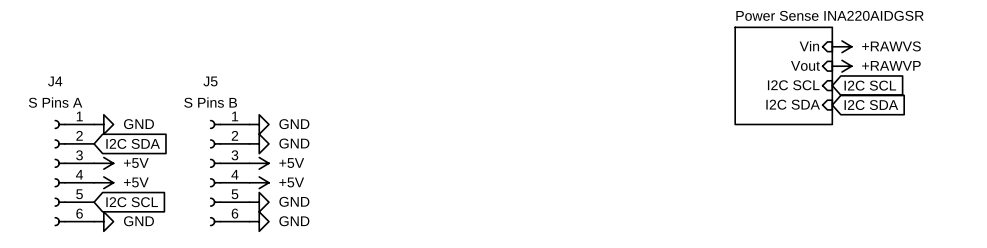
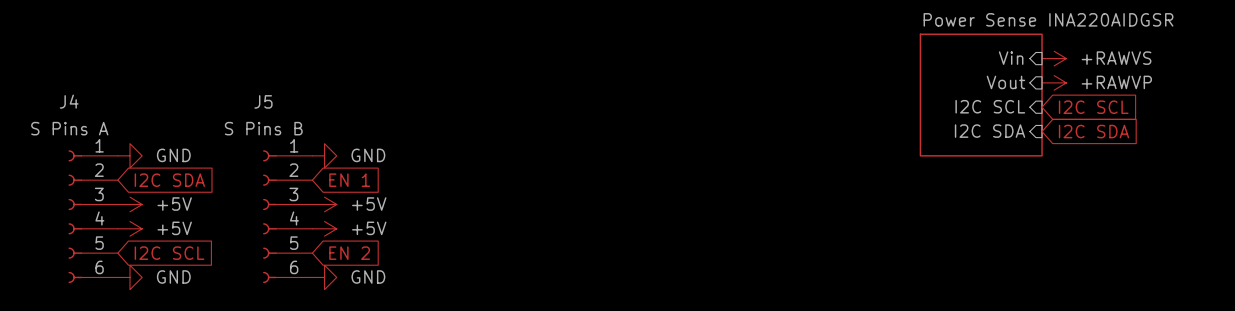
power symbol: GND (259, 143) -> none
global label: none -> EN 1 (349, 180)
power symbol: GND (259, 202) -> none
global label: none -> EN 2 (349, 253)

